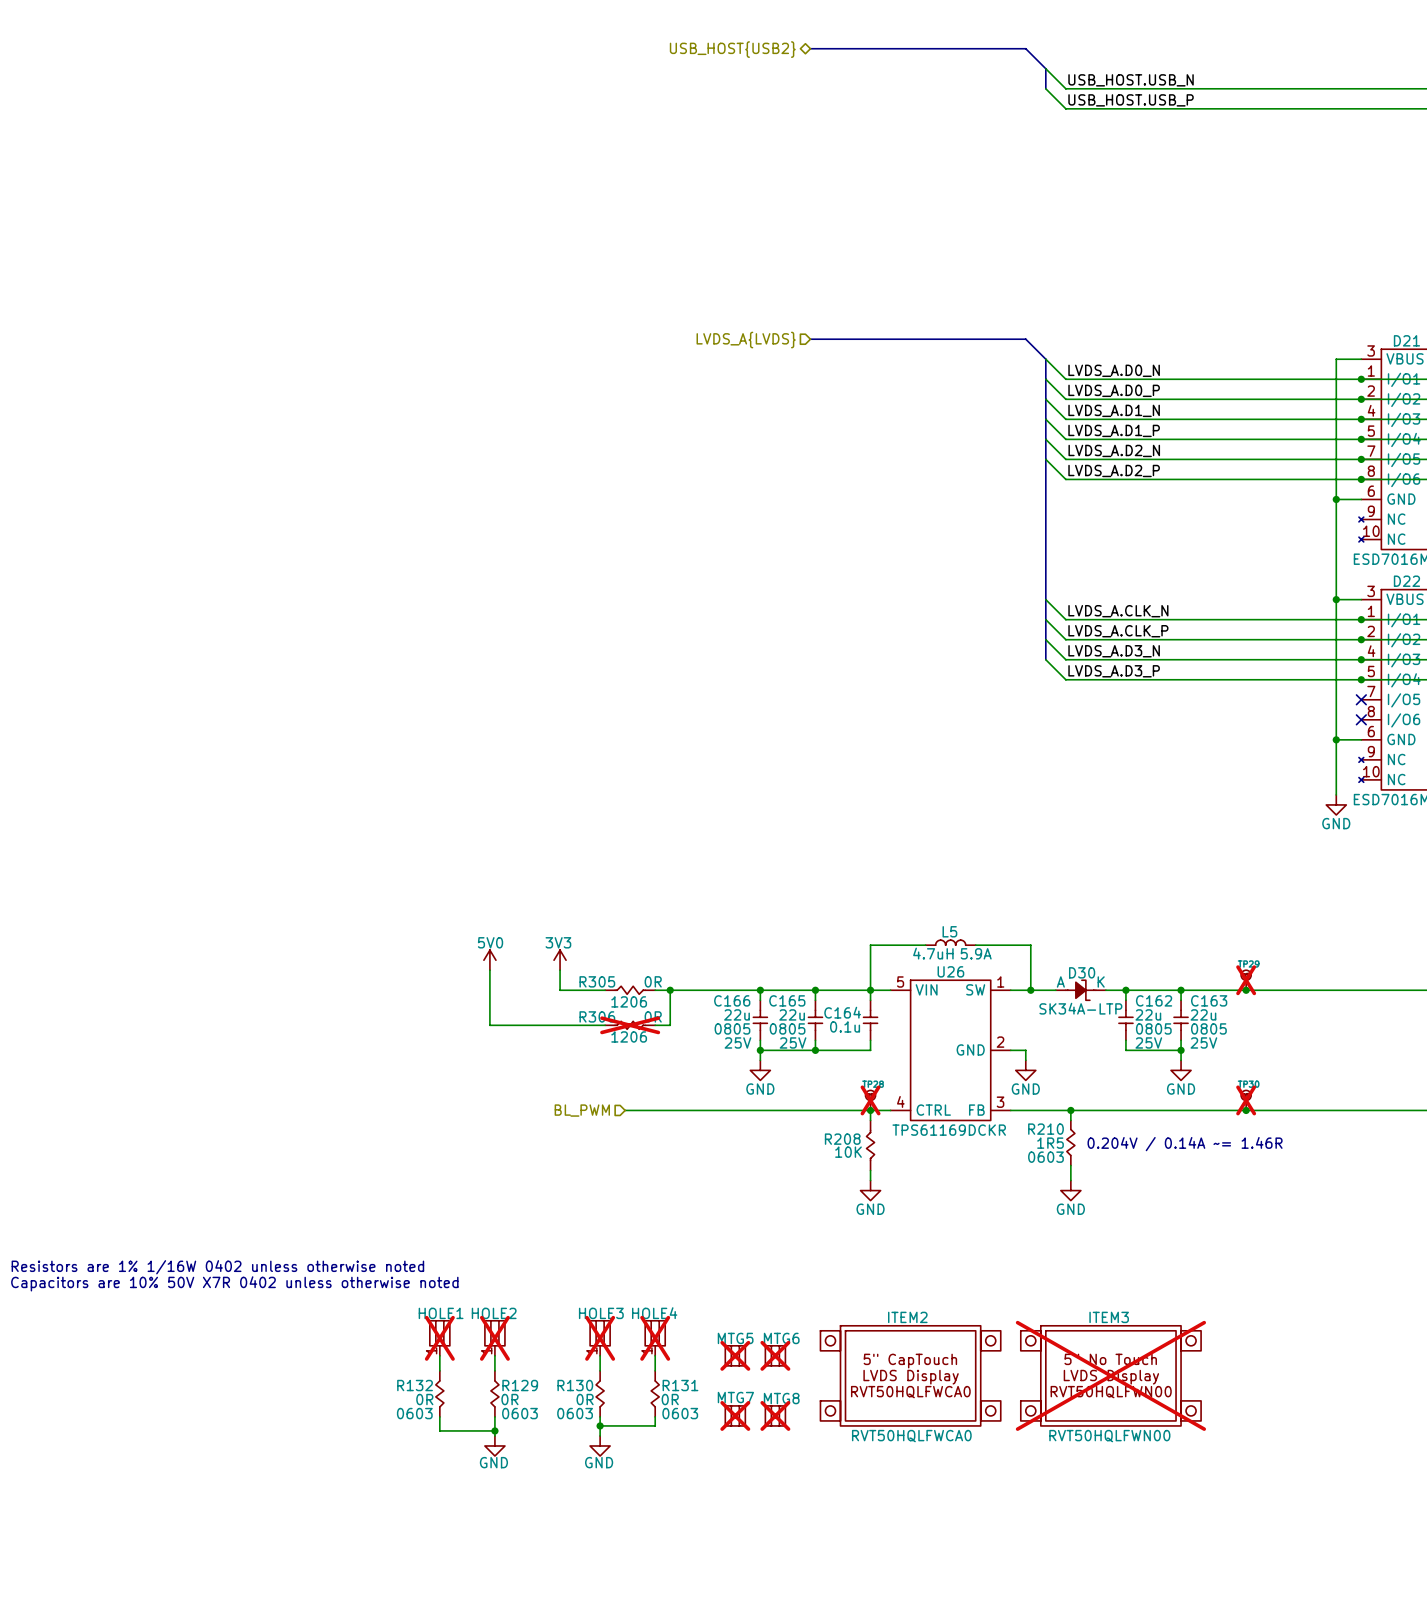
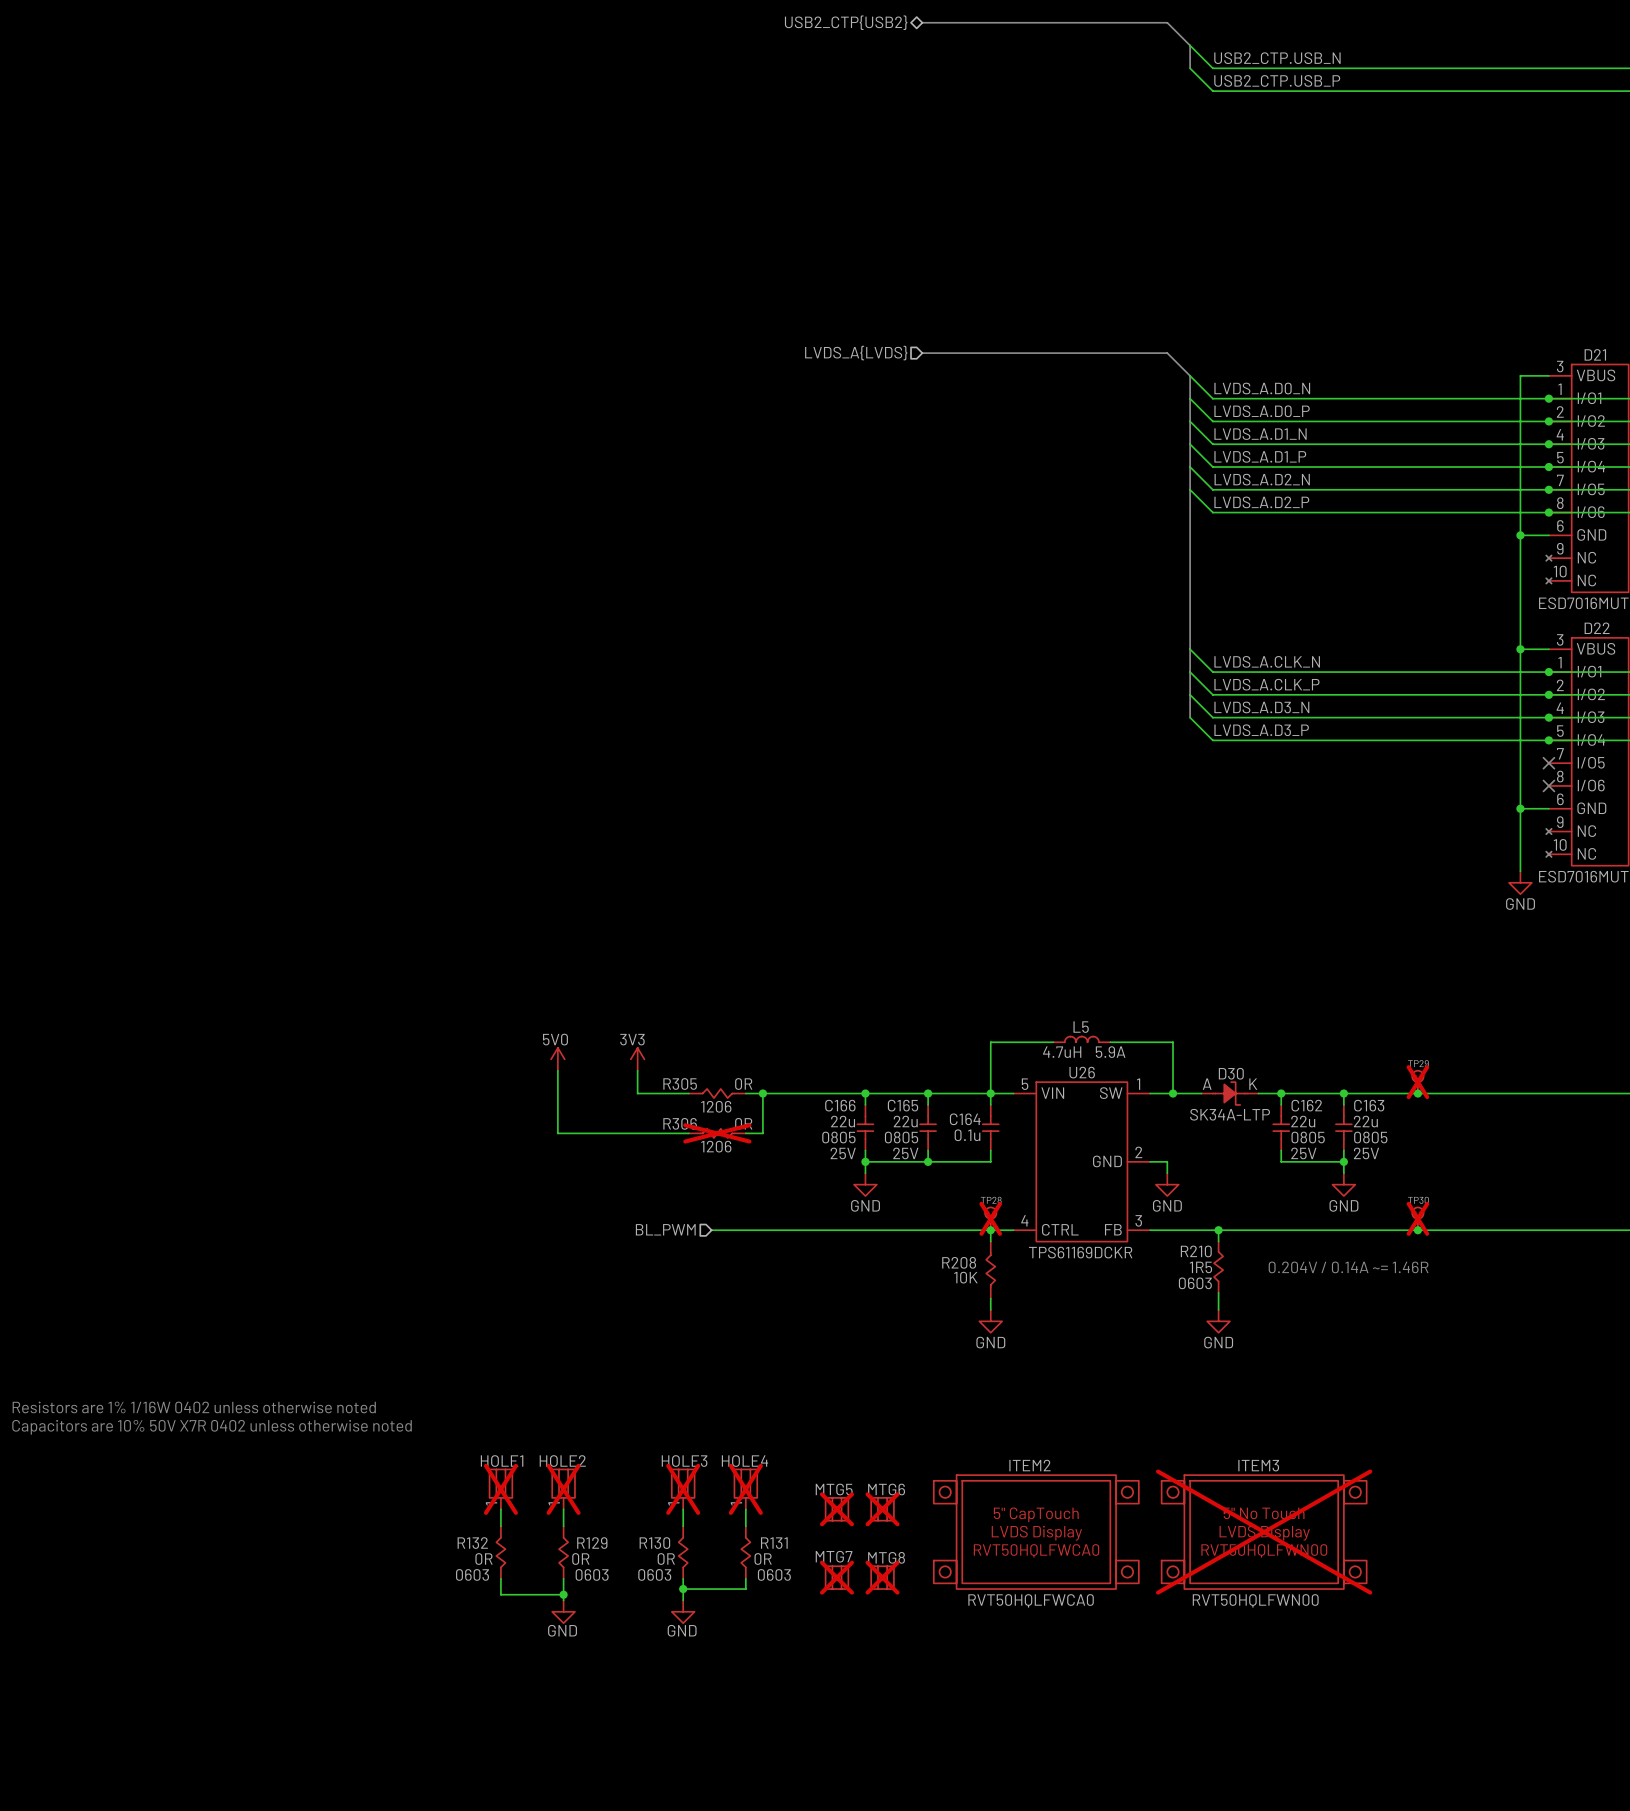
hierarchical label: USB_HOST{USB2} (732, 49) -> USB2_CTP{USB2} (846, 22)
label: USB_HOST.USB_N (1131, 80) -> USB2_CTP.USB_N (1277, 58)
label: USB_HOST.USB_P (1131, 100) -> USB2_CTP.USB_P (1277, 80)

